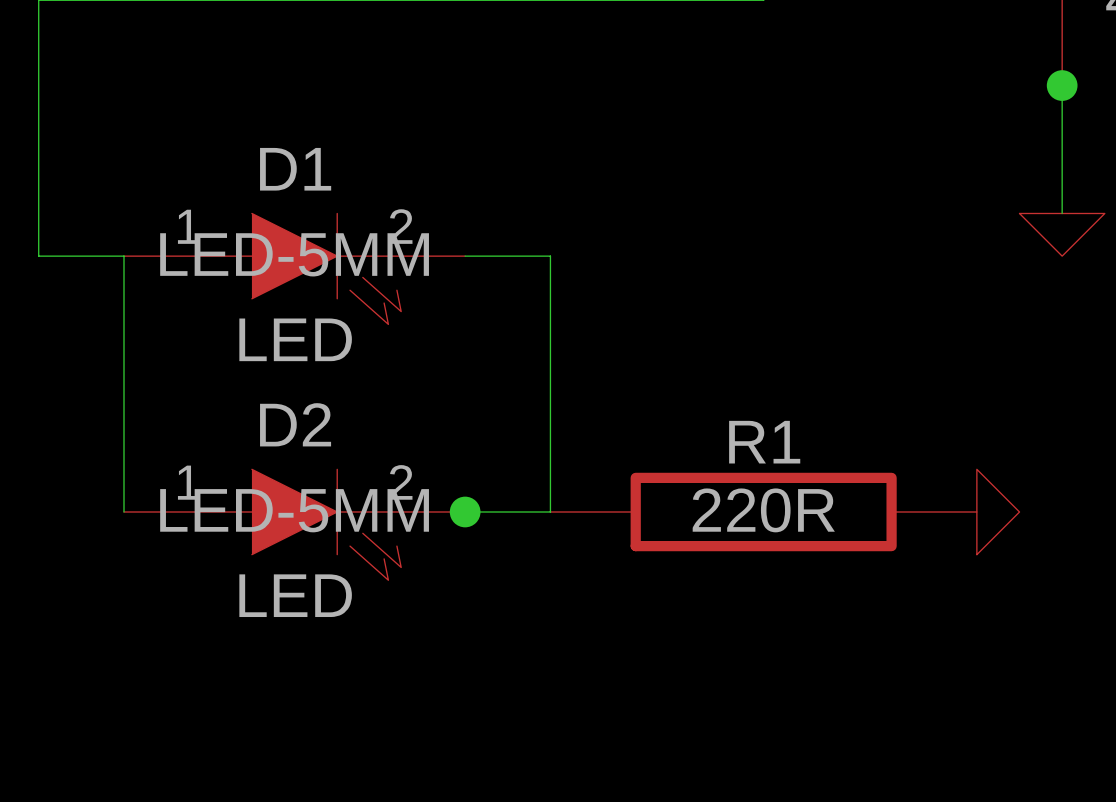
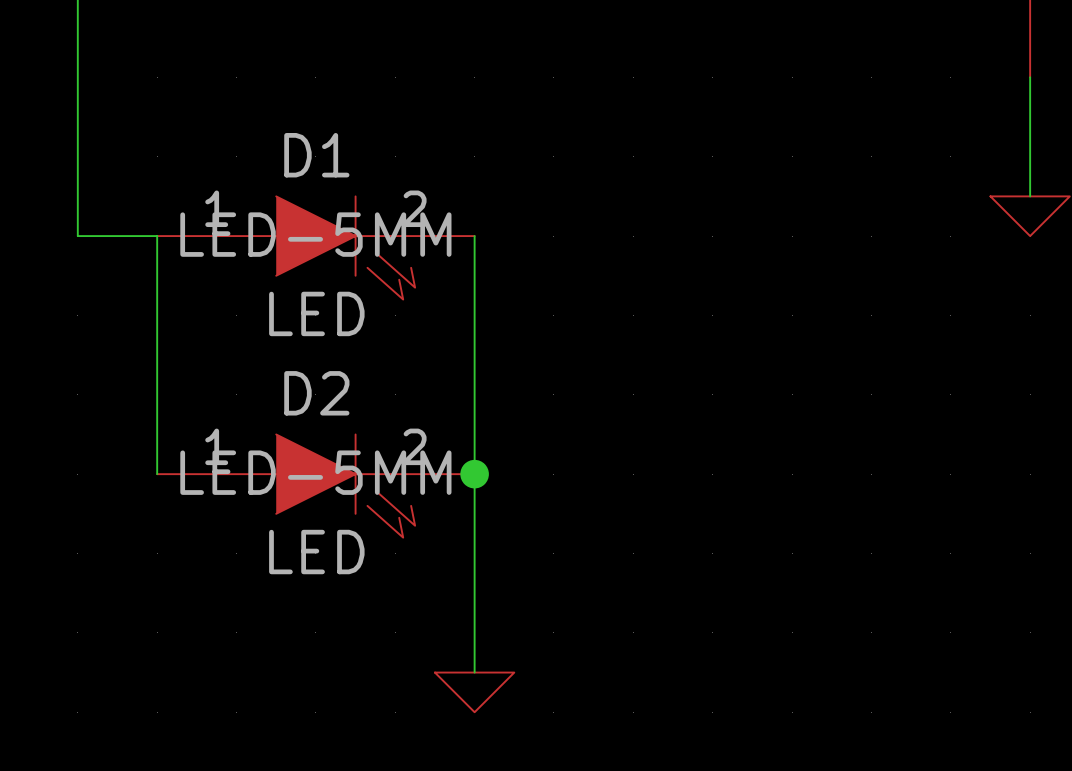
junction: (1062, 85) -> none
wire: (465, 256) (550, 256) (550, 512) (465, 512) -> (474, 236) (474, 672)
R1: 220R (763, 512) -> none
power symbol rotation: 0° (998, 512) -> 90° clockwise (474, 692)
power symbol position: (998, 512) -> (474, 692)

